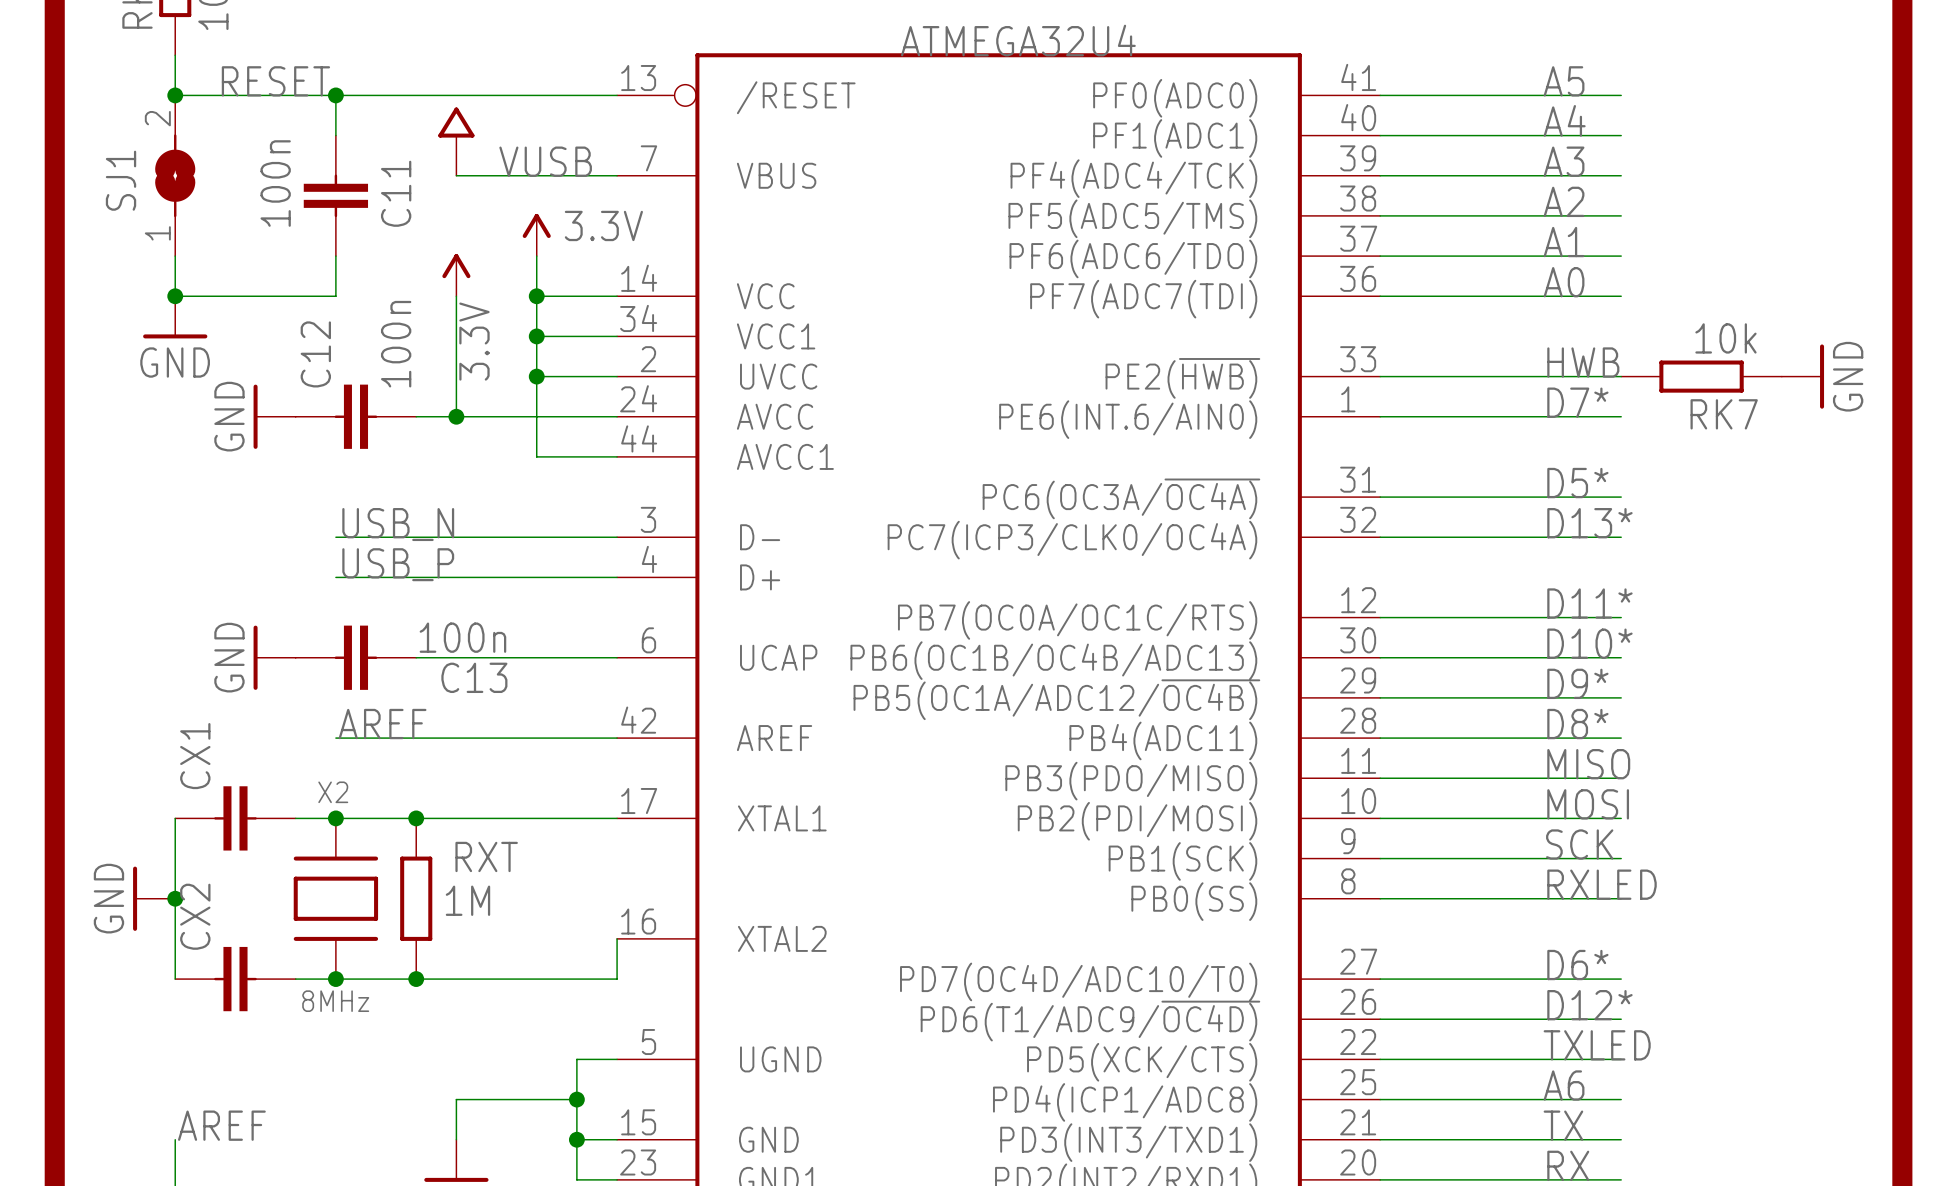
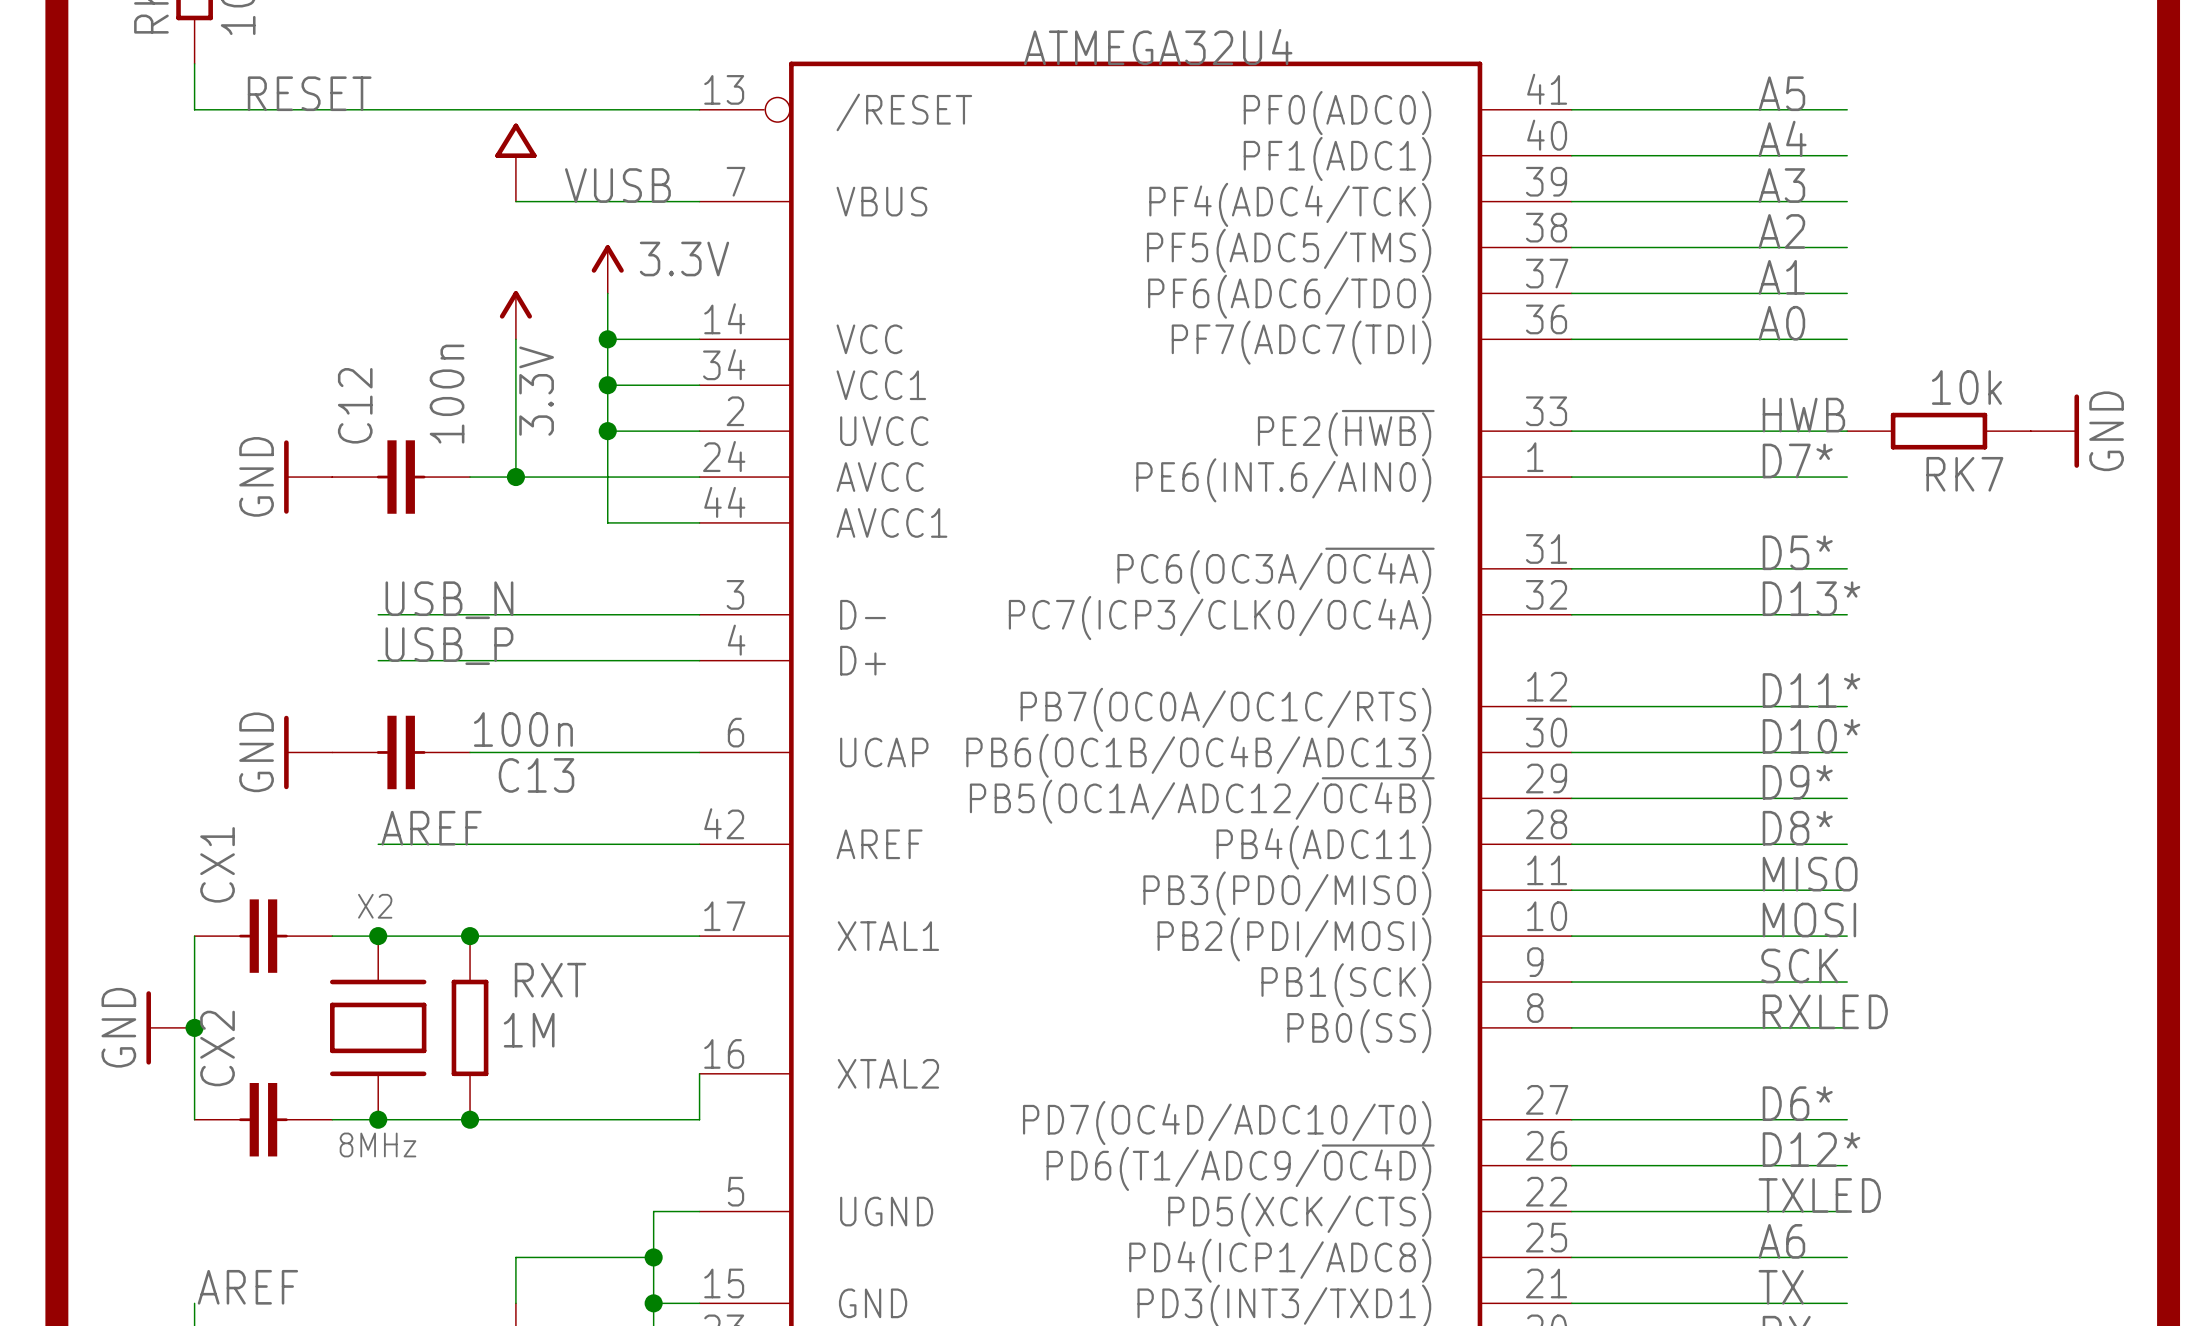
junction: (175, 95) -> none
wire: (335, 95) (335, 135) -> none
junction: (335, 95) -> none
SJ1: (175, 175) -> none
C11: 100n (335, 195) -> none
wire: (175, 256) (175, 296) (335, 296) (335, 256) -> none
junction: (175, 296) -> none
power symbol: GND (175, 317) -> none

